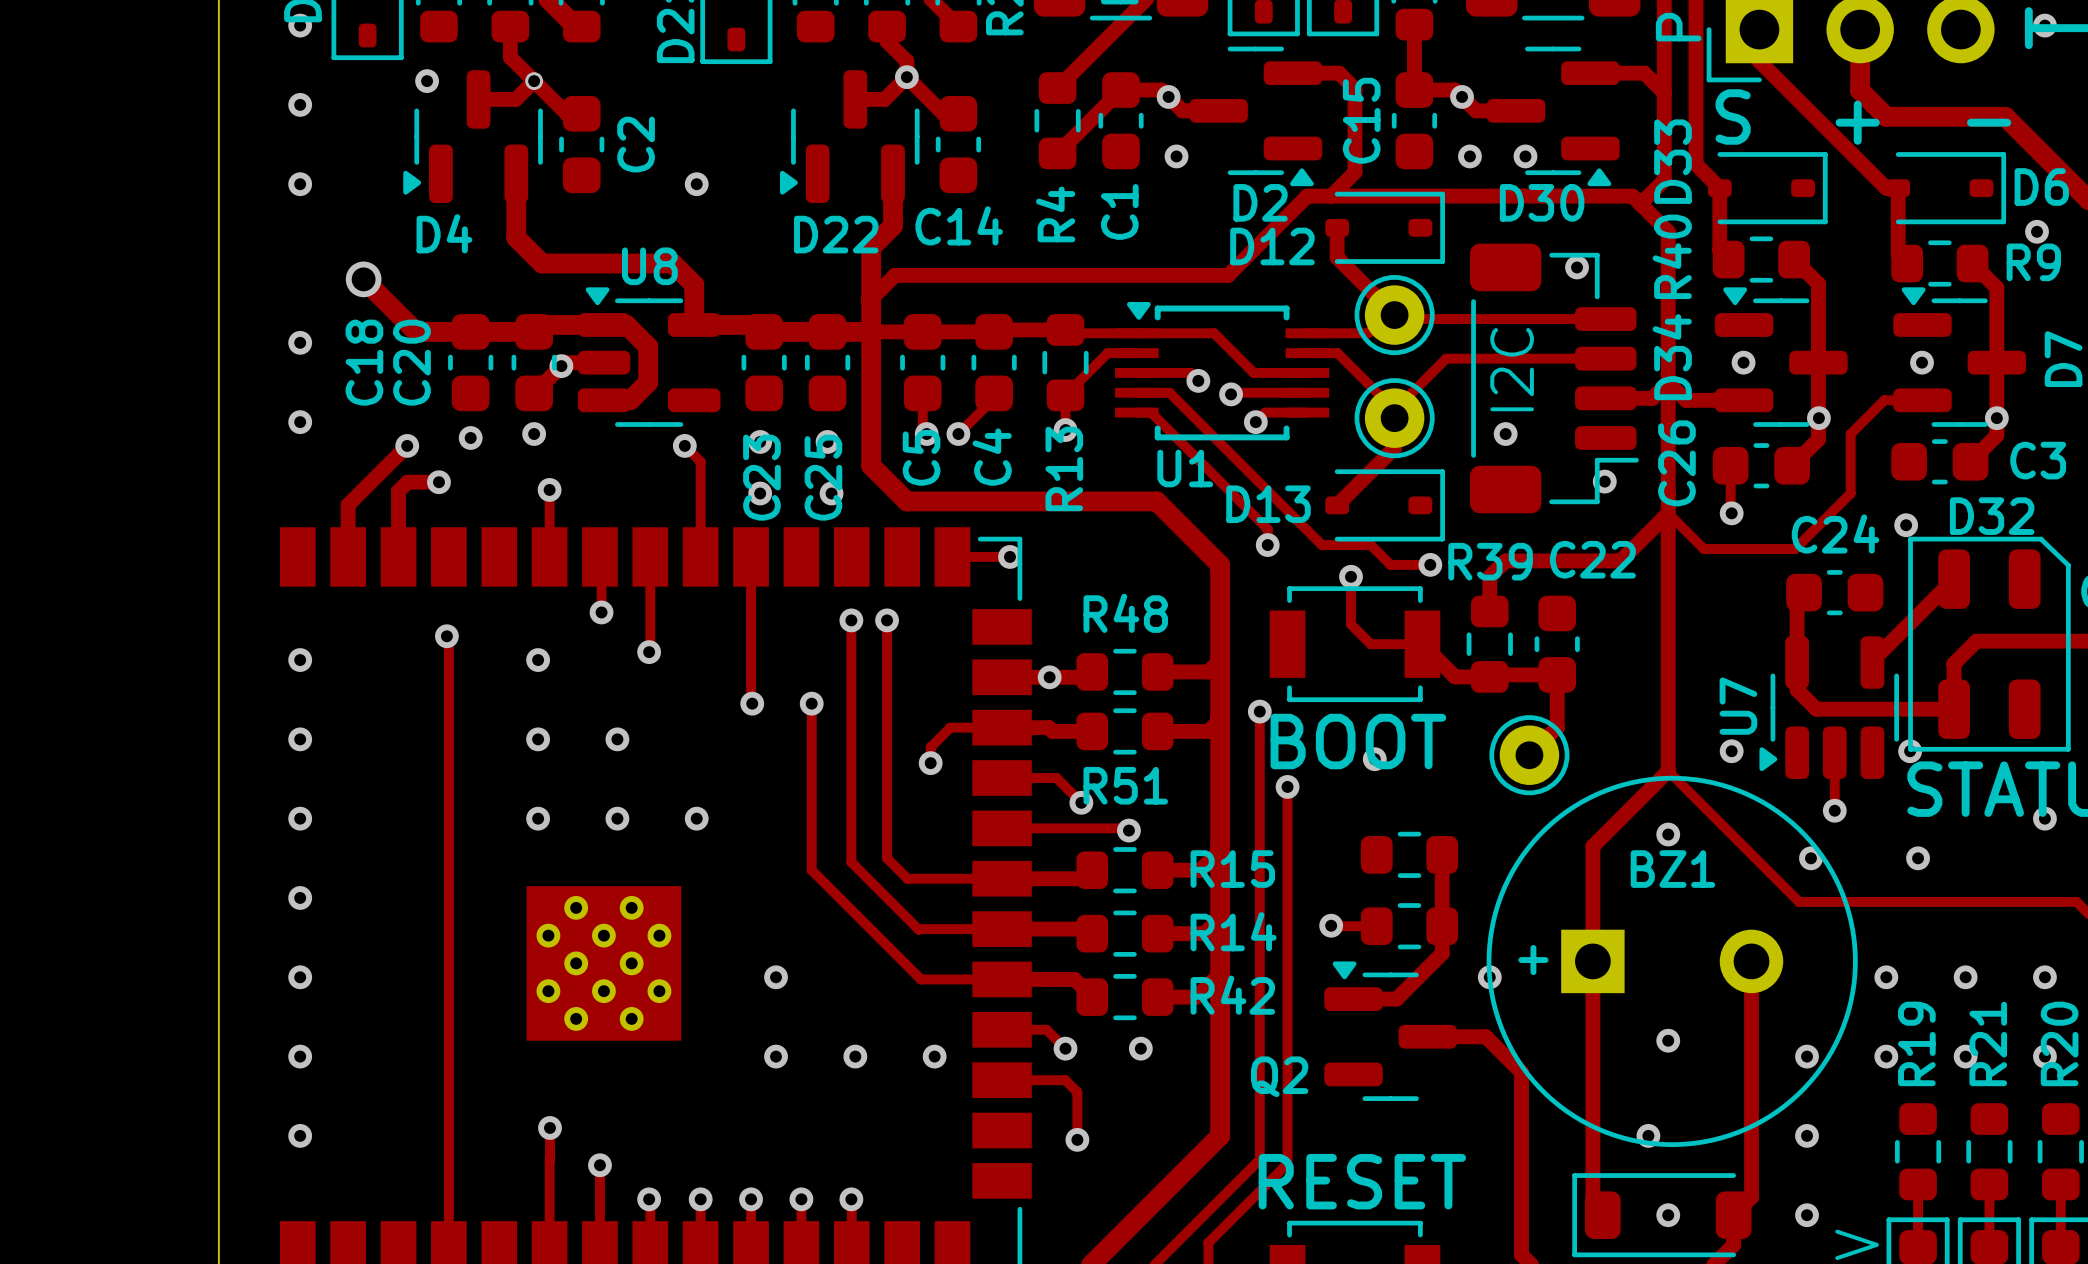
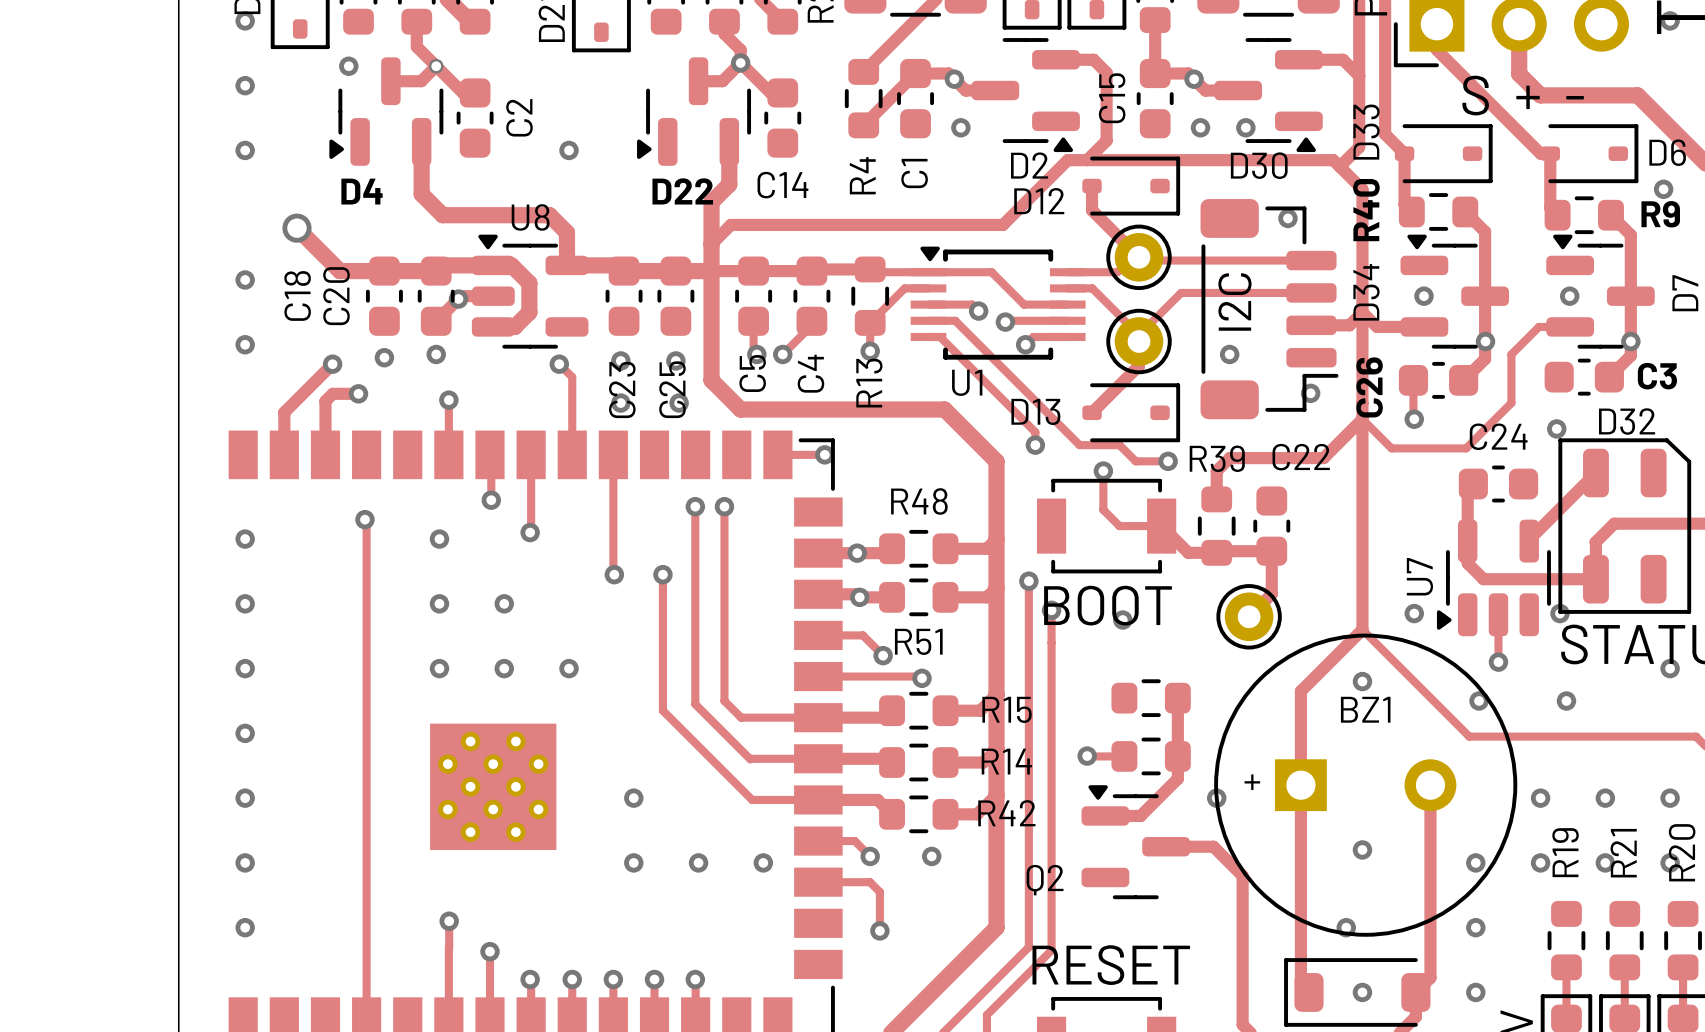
track: (1002, 727) (950, 727) (930, 747) (930, 763) -> none
via: none -> (859, 597)
track: none -> (1051, 610) (1051, 642)
via: (930, 763) -> none
via position: (1287, 786) -> (1051, 610)

